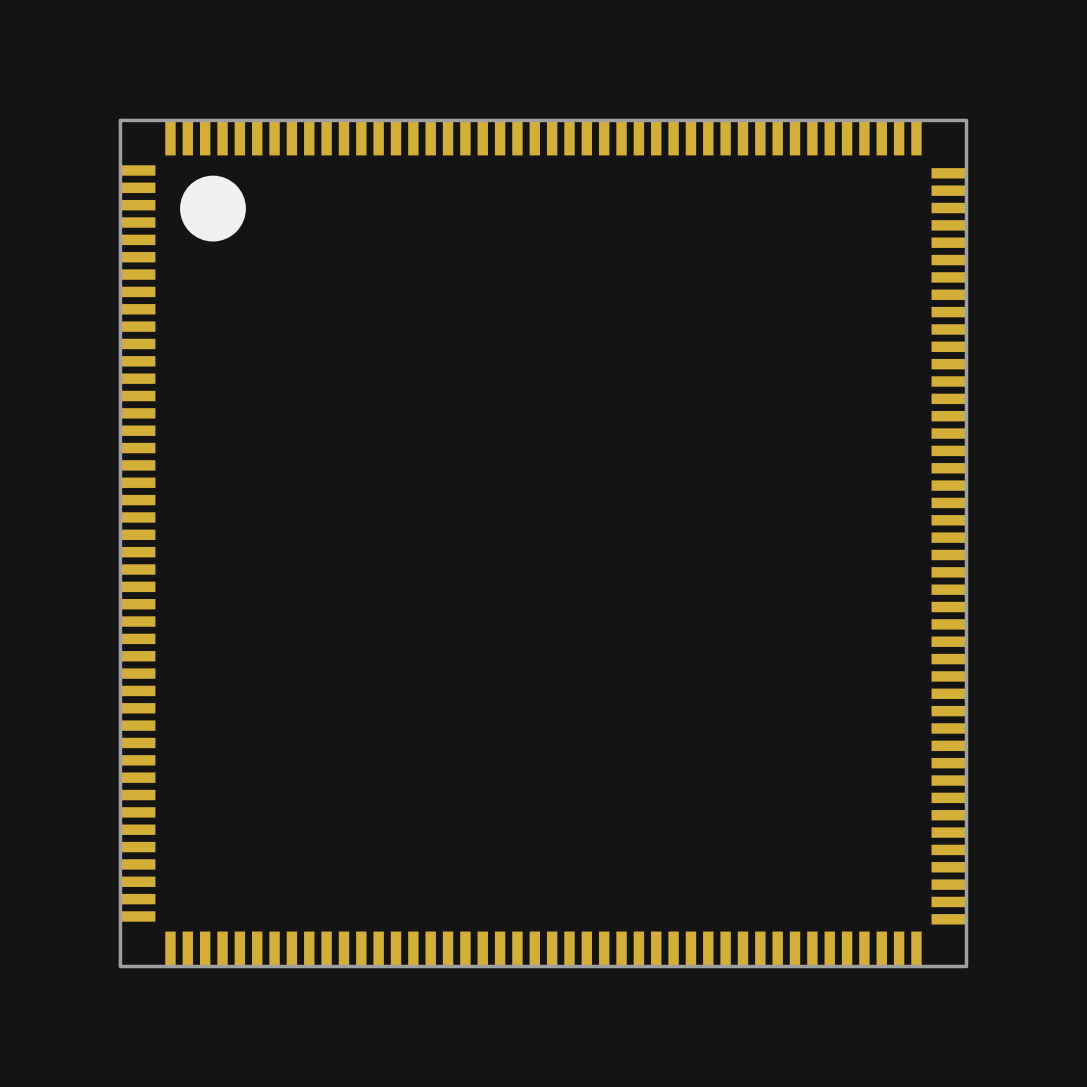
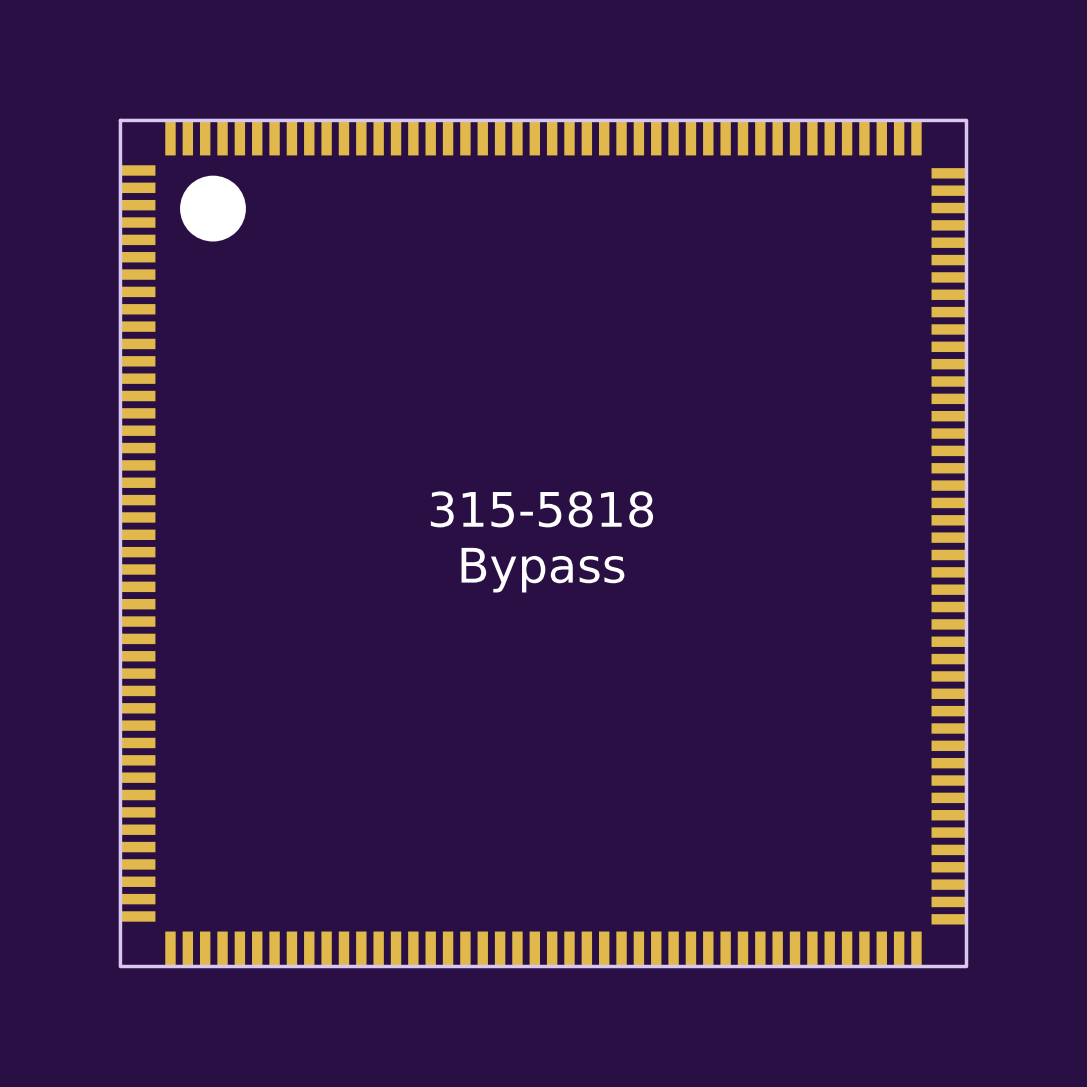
text: none -> 315-5818 (541, 509)
text: none -> Bypass (542, 570)

